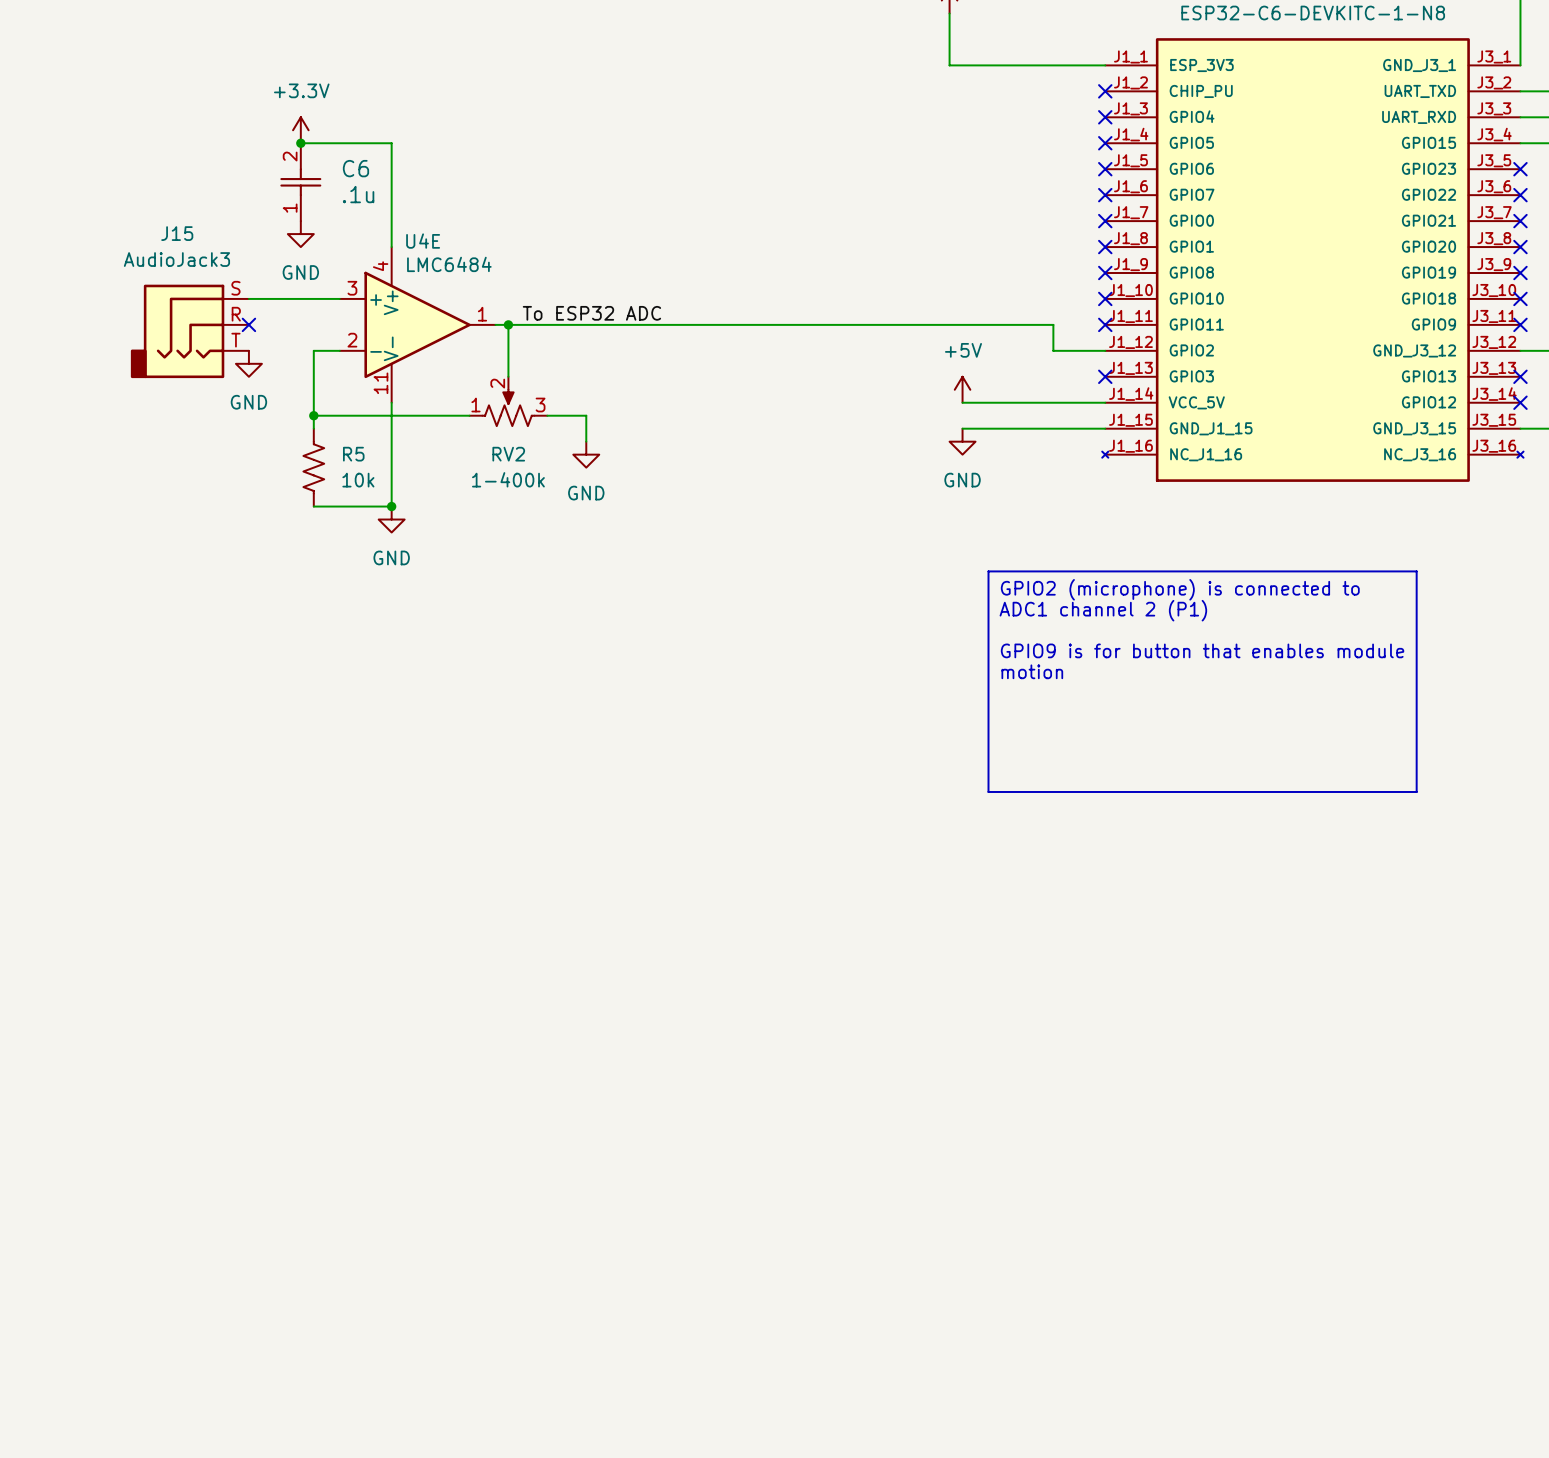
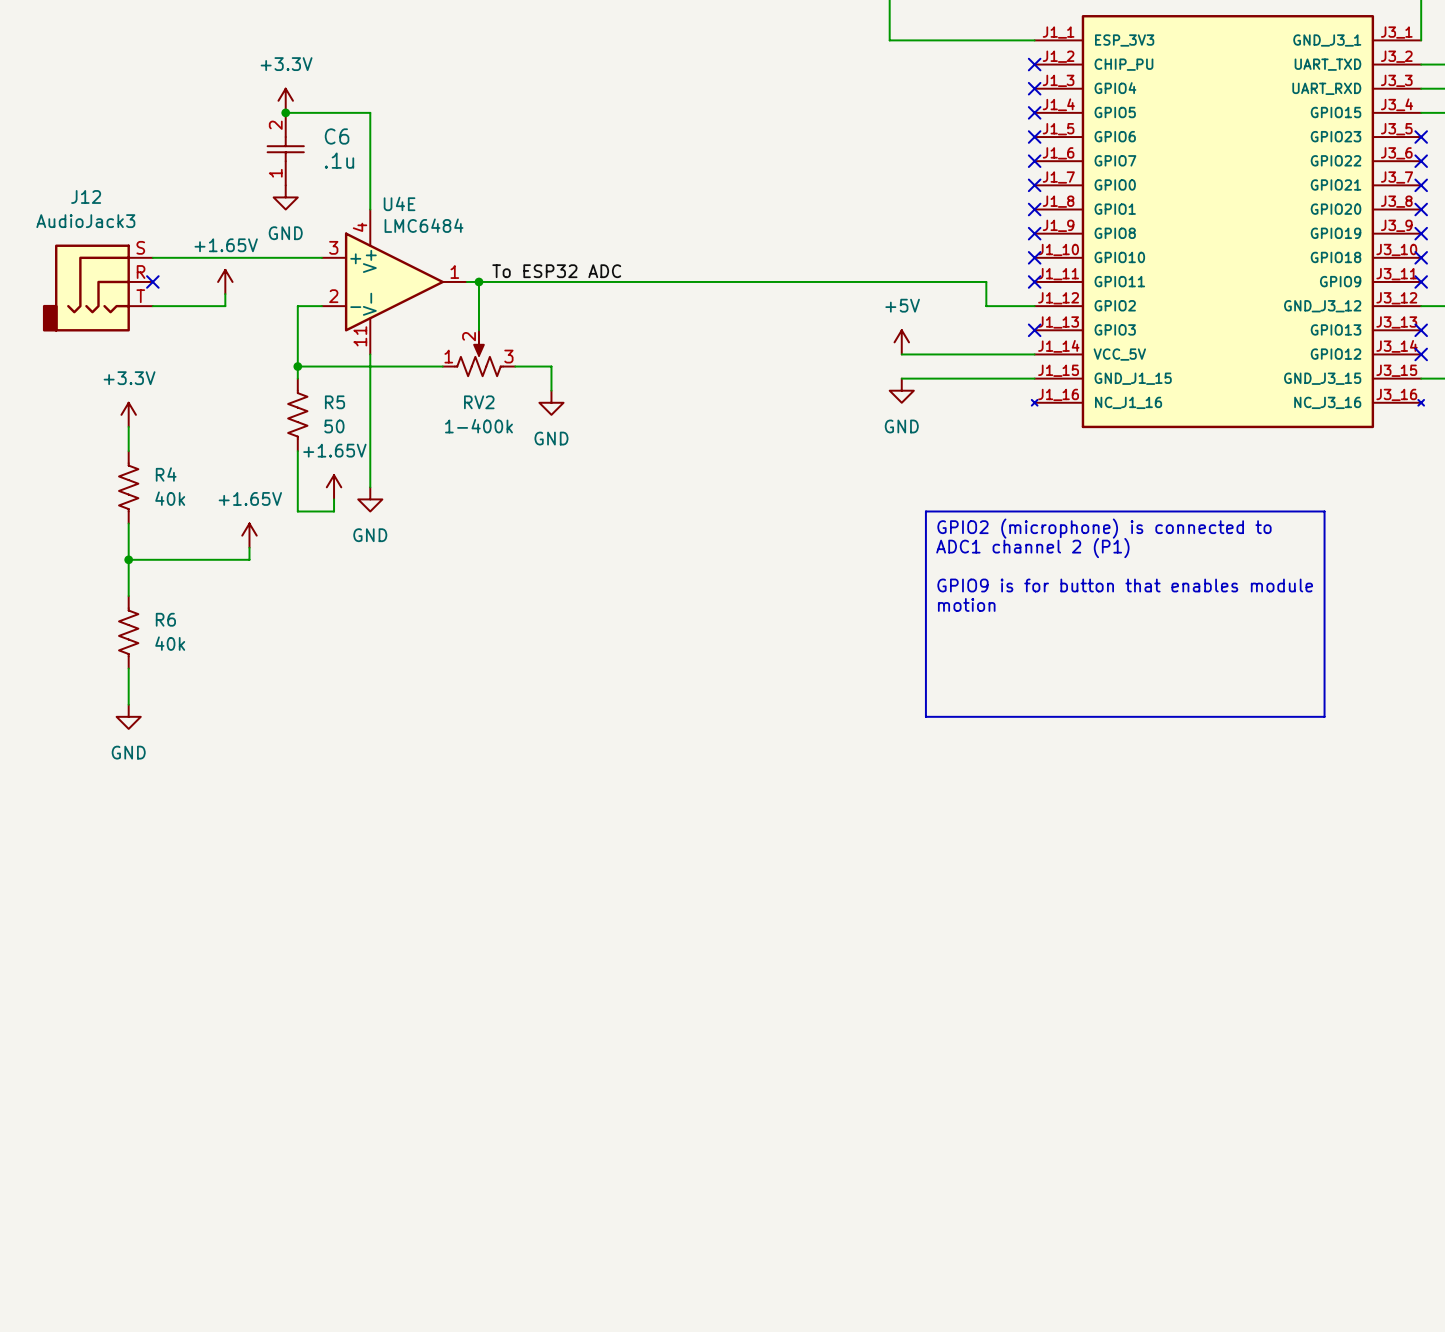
no-connect mark: none -> (152, 281)
power symbol: none -> +1.65V (225, 281)
no-connect mark: (248, 324) -> none
J12: none -> AudioJack3 (97, 288)
J15: AudioJack3 (189, 331) -> none
power symbol: GND (248, 363) -> none
power symbol: none -> +3.3V (128, 414)
wire: none -> (128, 426) (128, 451)
R5 value: 10k (358, 480) -> 50 (334, 426)
wire: (313, 506) (391, 506) -> (297, 451) (297, 511) (334, 511) (334, 499)
wire: none -> (370, 451) (370, 487)
junction: (391, 506) -> none
power symbol position: GND (391, 519) -> GND (370, 499)
R4: none -> 40k (128, 487)
power symbol: none -> +1.65V (334, 487)
wire: none -> (128, 523) (128, 596)
power symbol: none -> +1.65V (249, 535)
wire: none -> (249, 547) (249, 559) (128, 559)
junction: none -> (128, 559)
R6: none -> 40k (128, 632)
wire: none -> (128, 668) (128, 704)
power symbol: none -> GND (128, 716)

